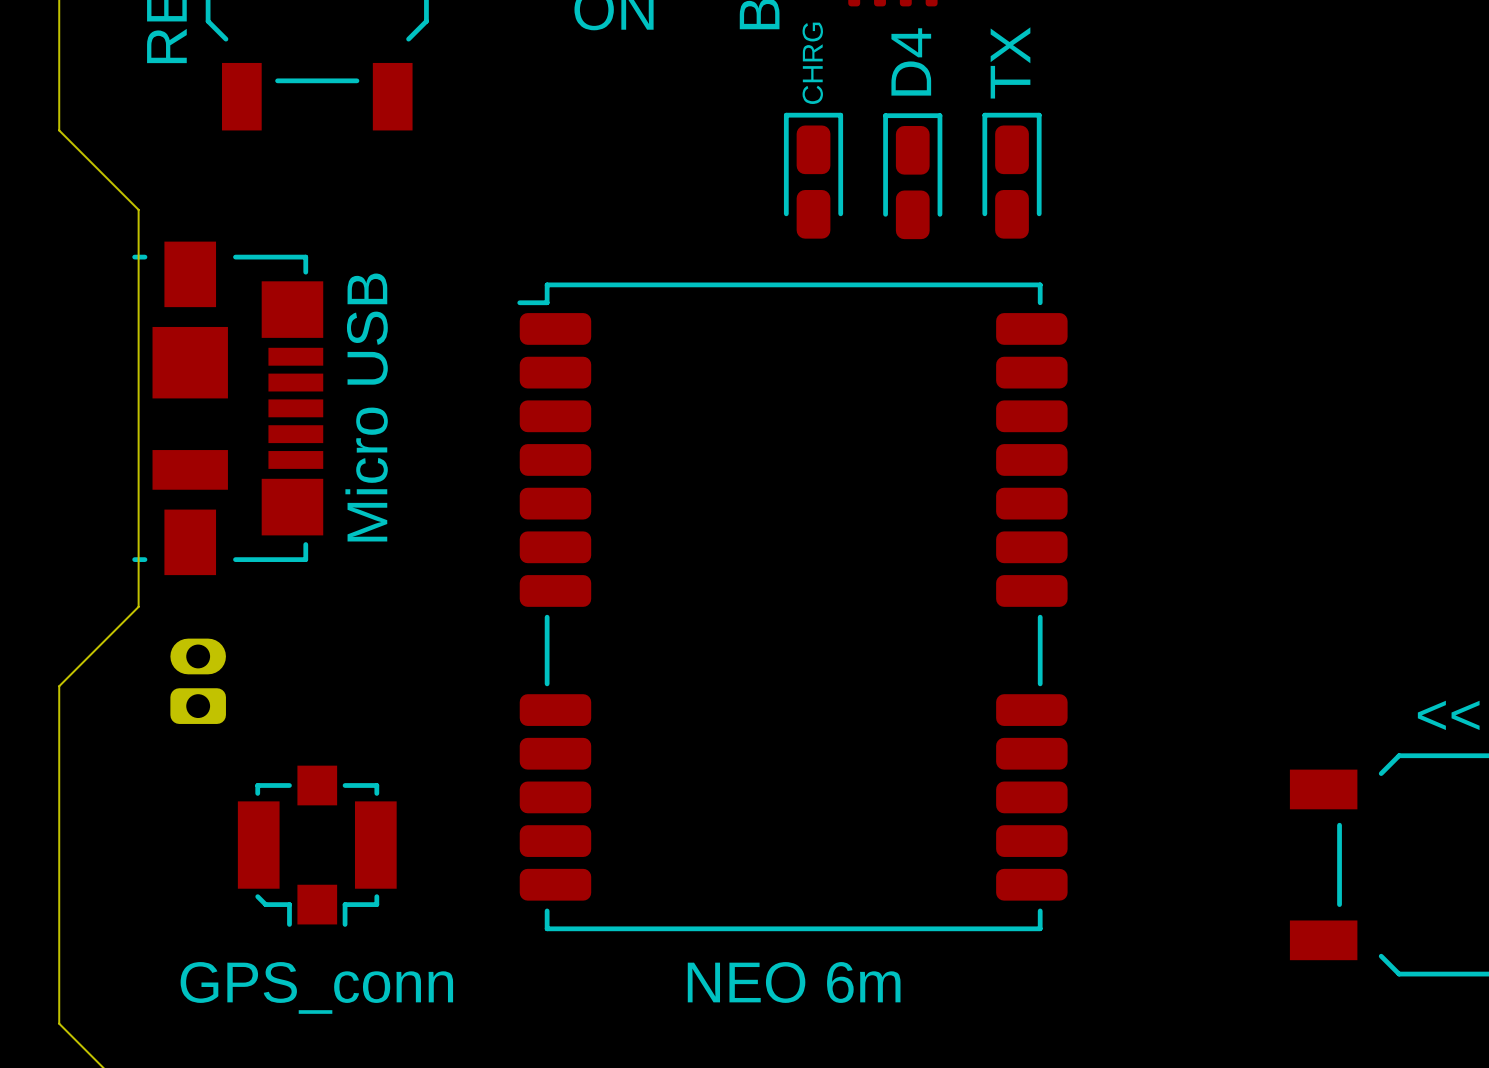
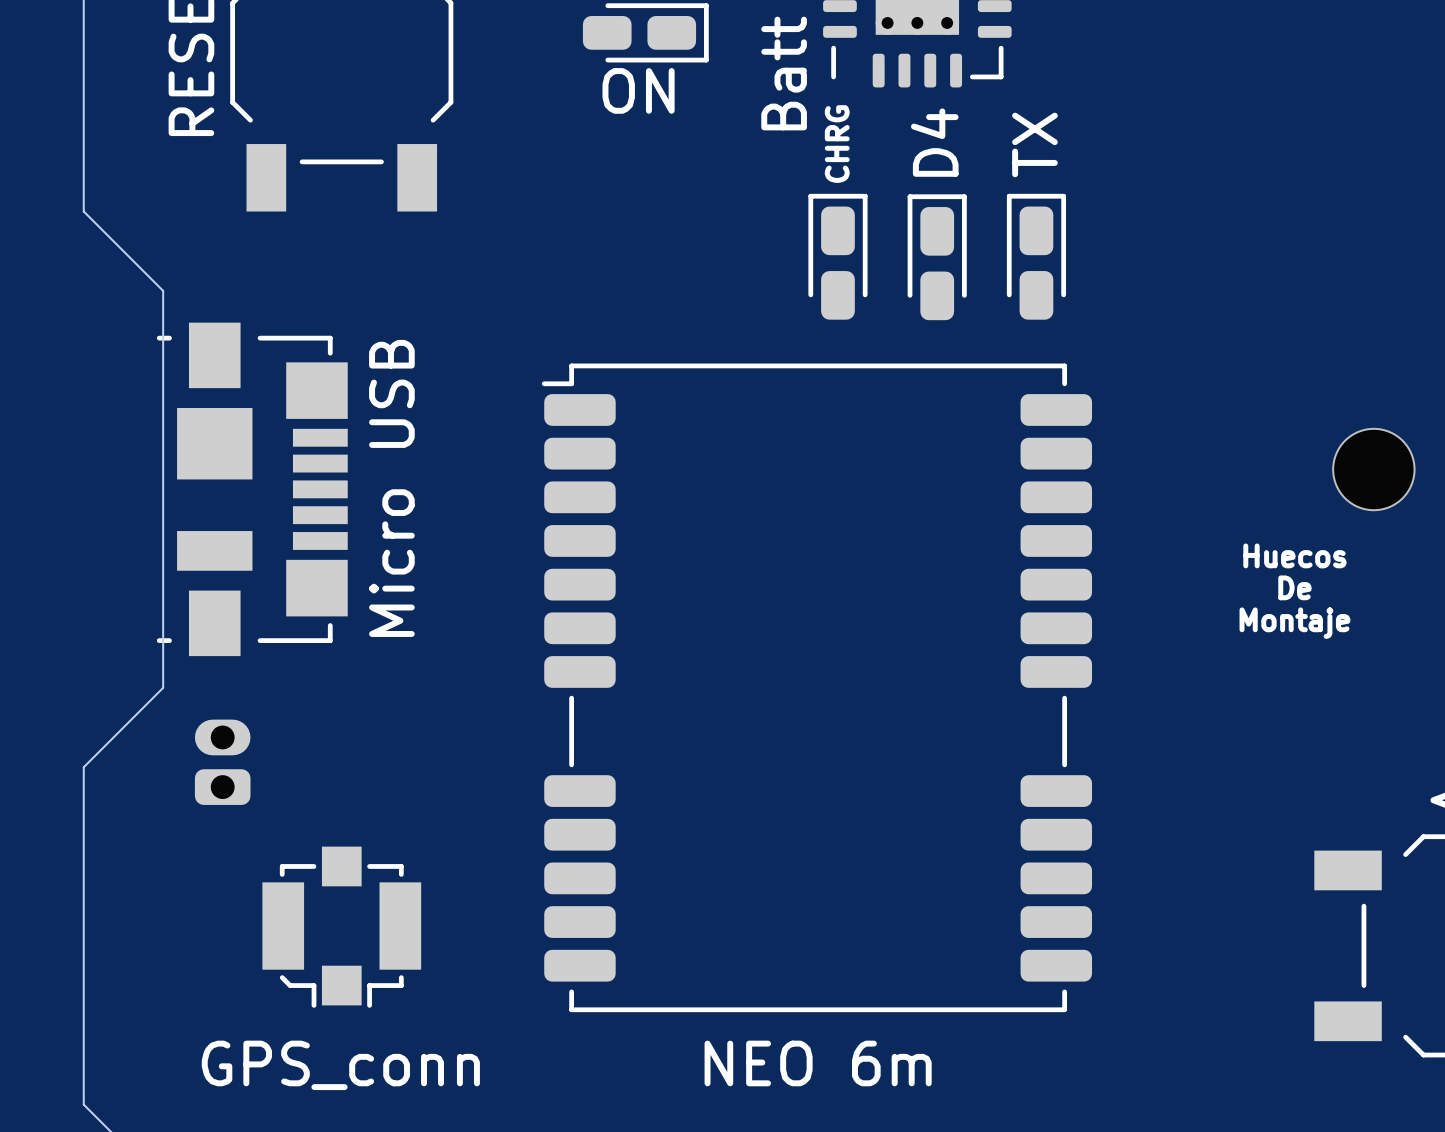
via: none -> (1373, 469)
text: none -> Huecos (1294, 555)
text: none -> De (1294, 587)
text: none -> Montaje (1294, 623)

